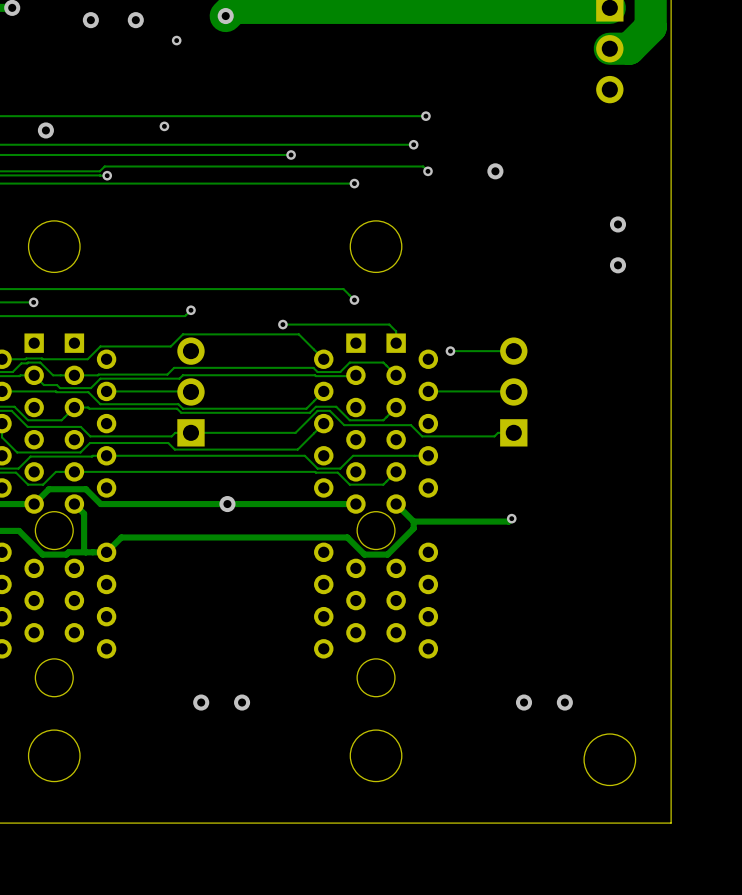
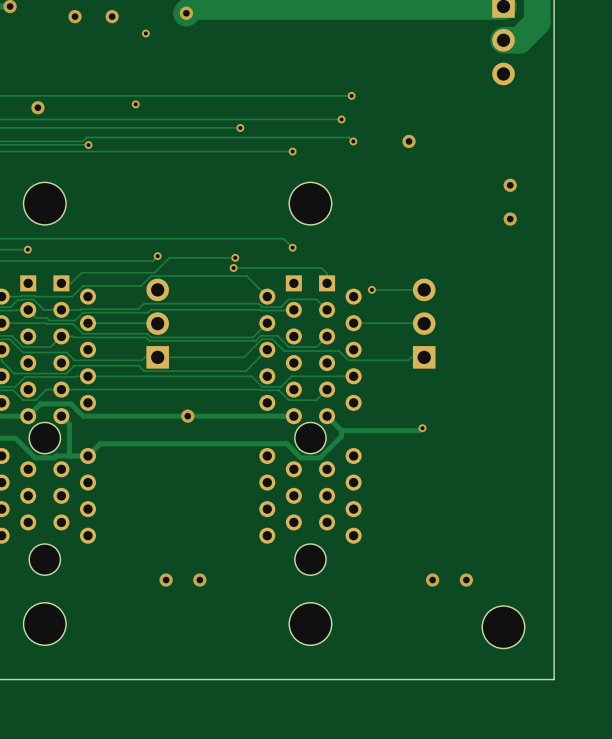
track: none -> (235, 257) (169, 257) (154, 272) (81, 272) (71, 283) (61, 283)
via: none -> (235, 257)

